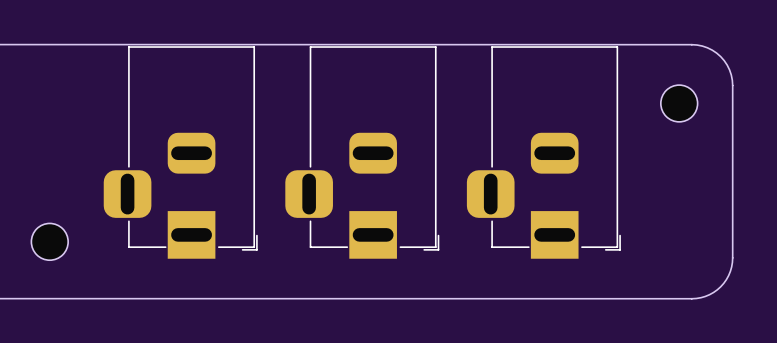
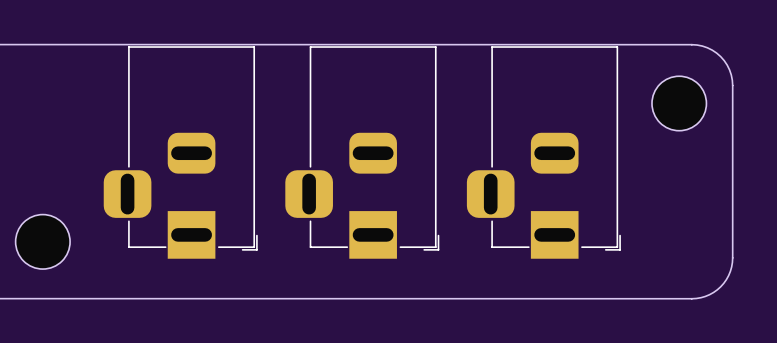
part footprint: [660, 85, 698, 122] -> [651, 76, 707, 131]
part footprint: [31, 223, 69, 261] -> [15, 214, 71, 270]

